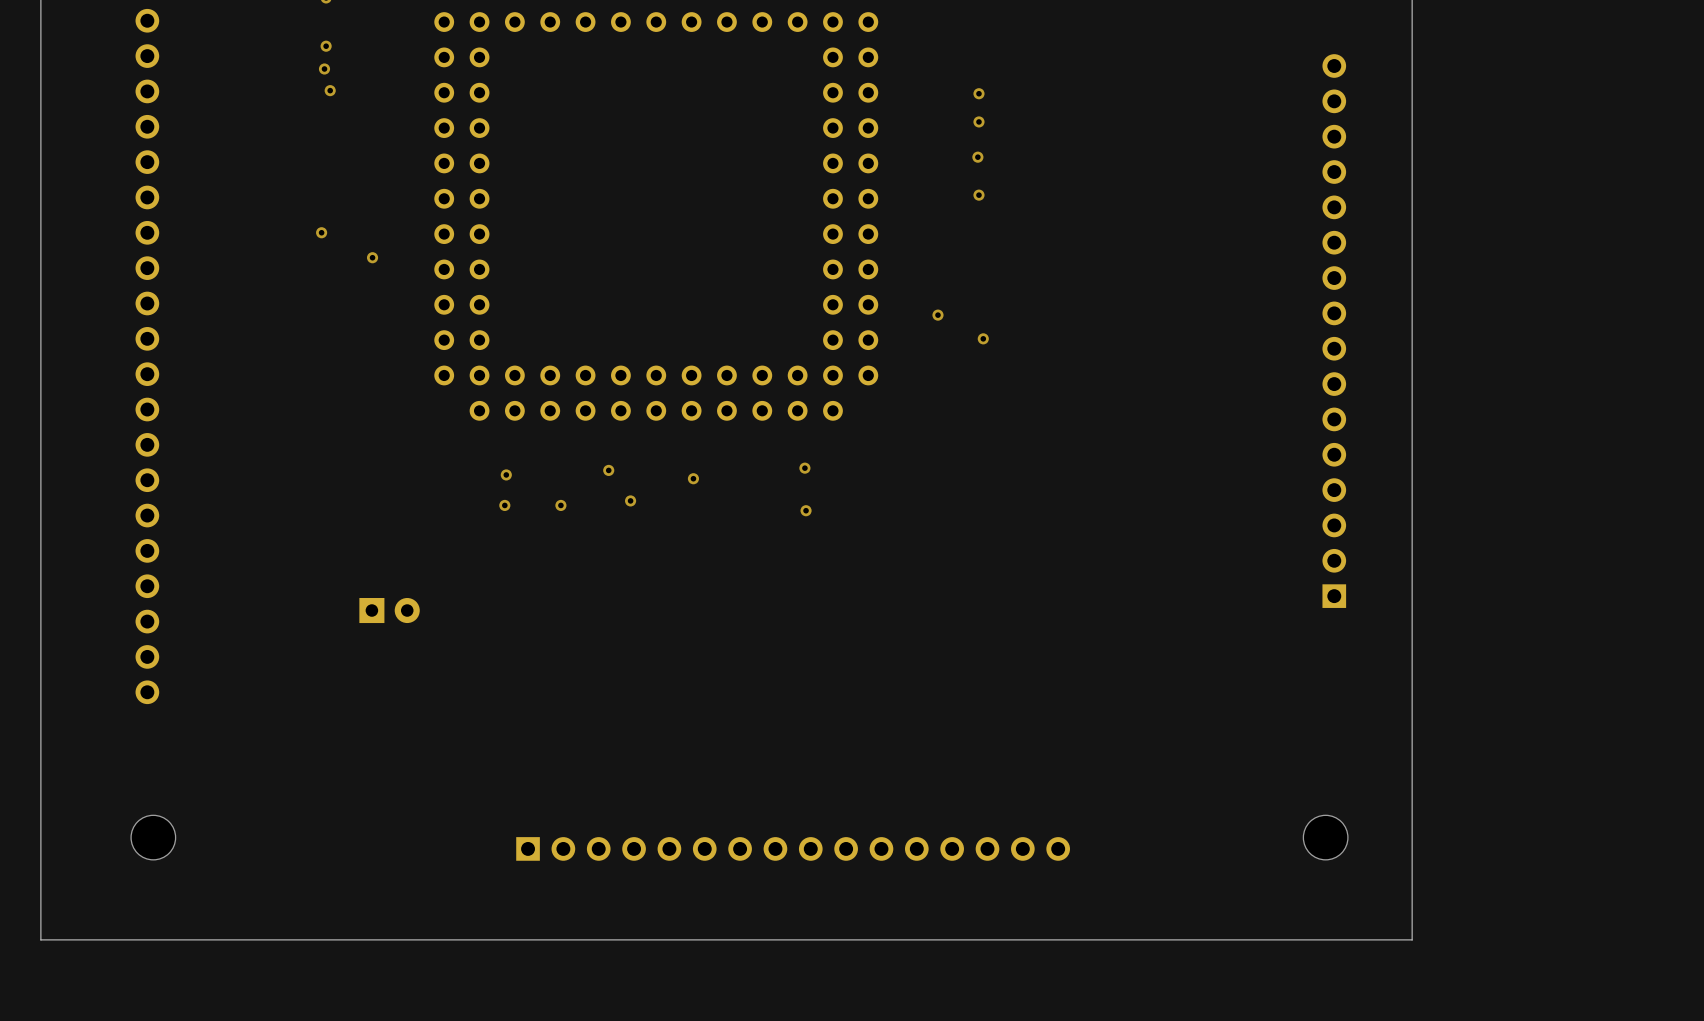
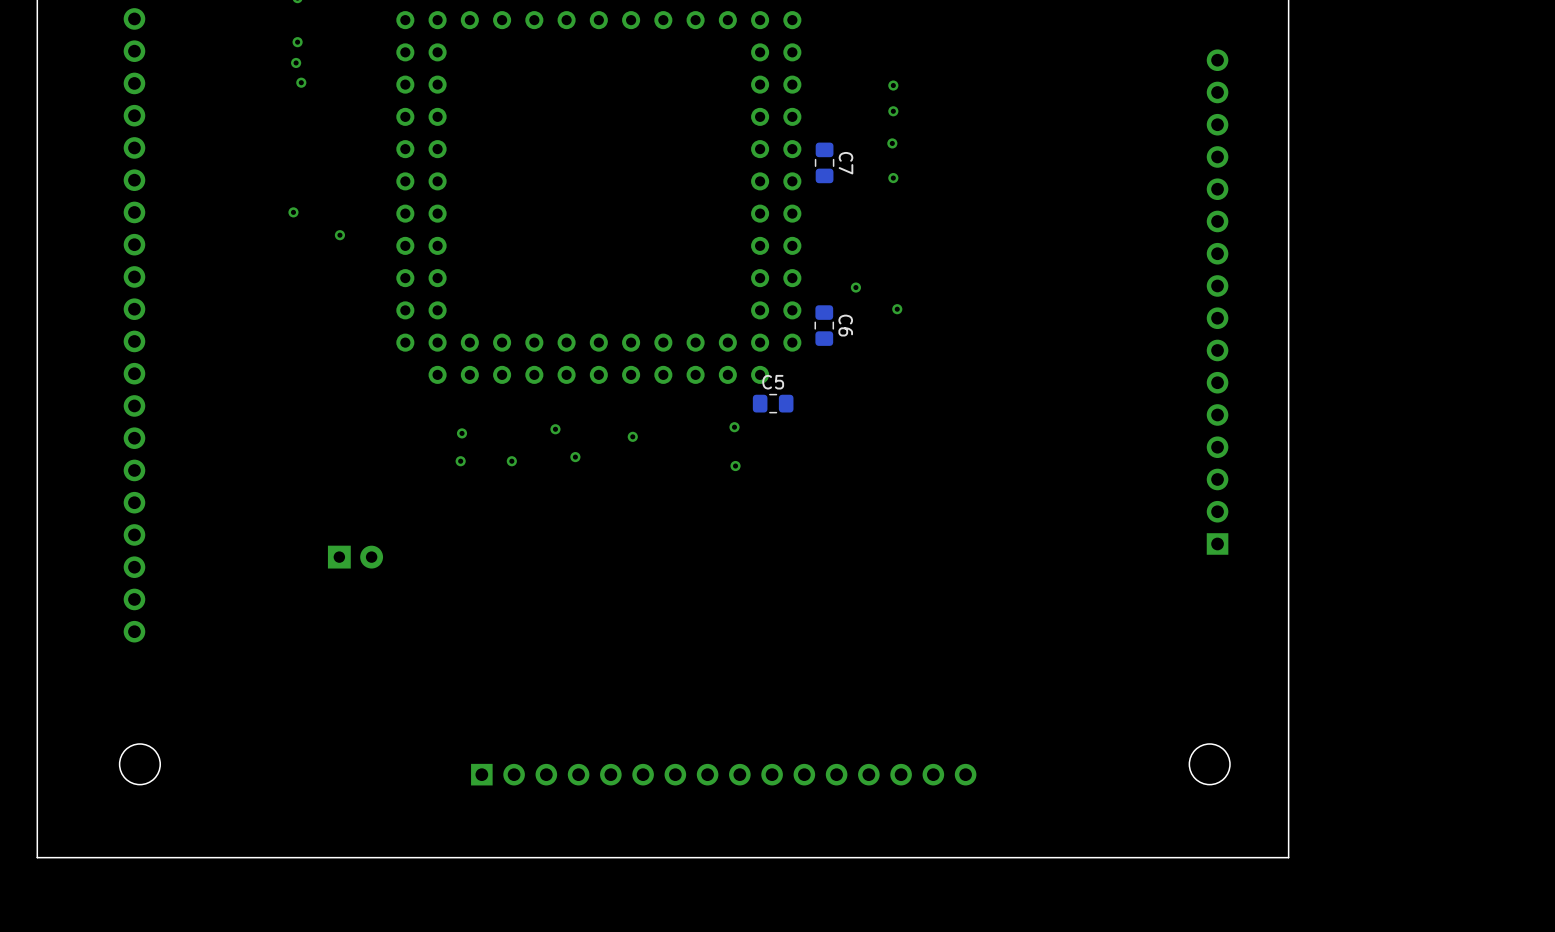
C7: none -> (824, 162)
C6: none -> (824, 325)
C5: none -> (773, 403)

